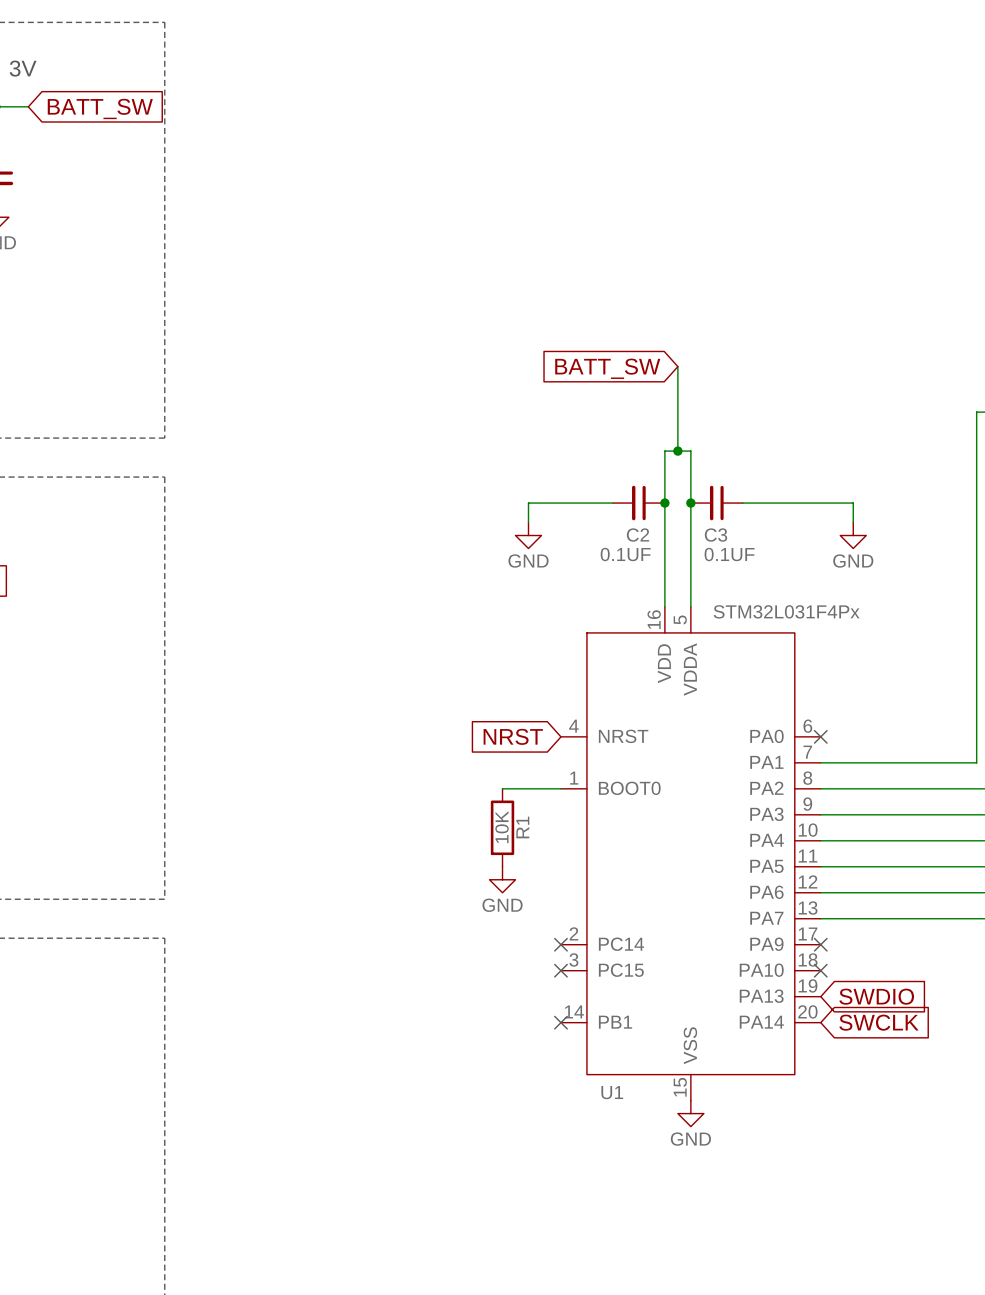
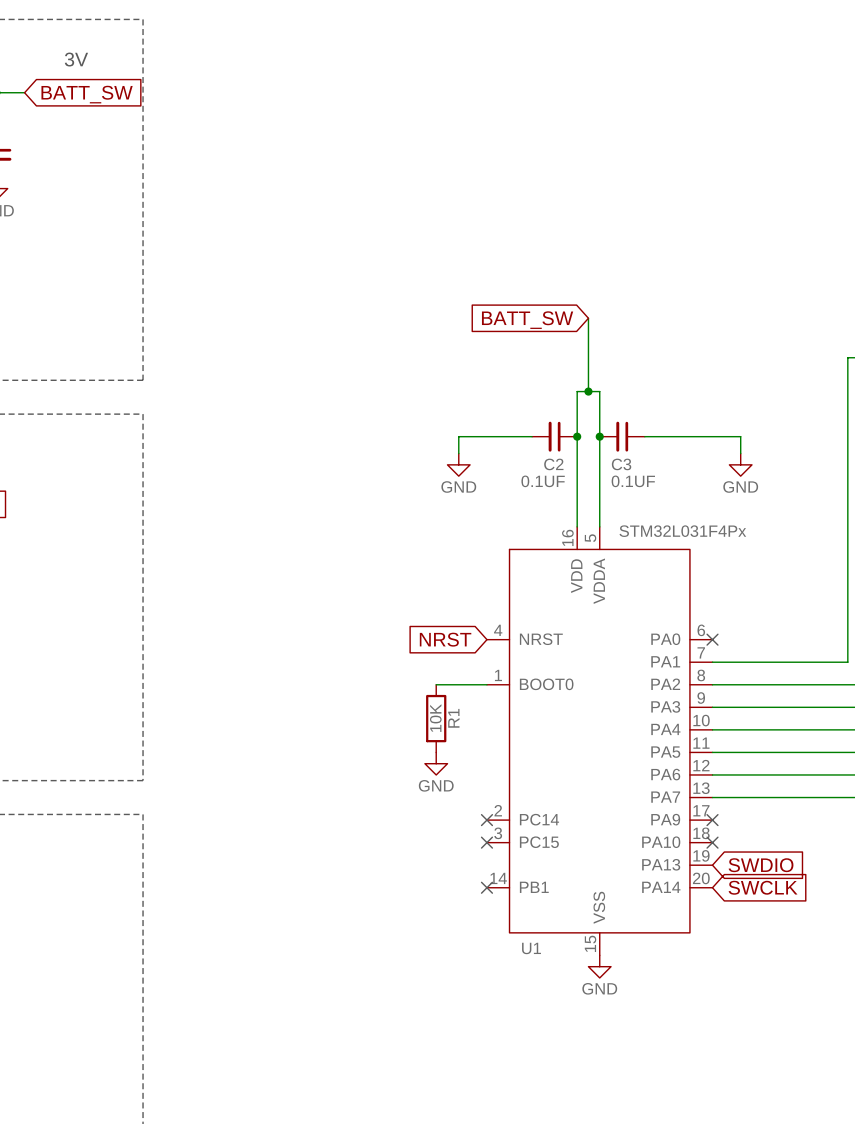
text position: 3V (23, 68) -> 3V (76, 59)

